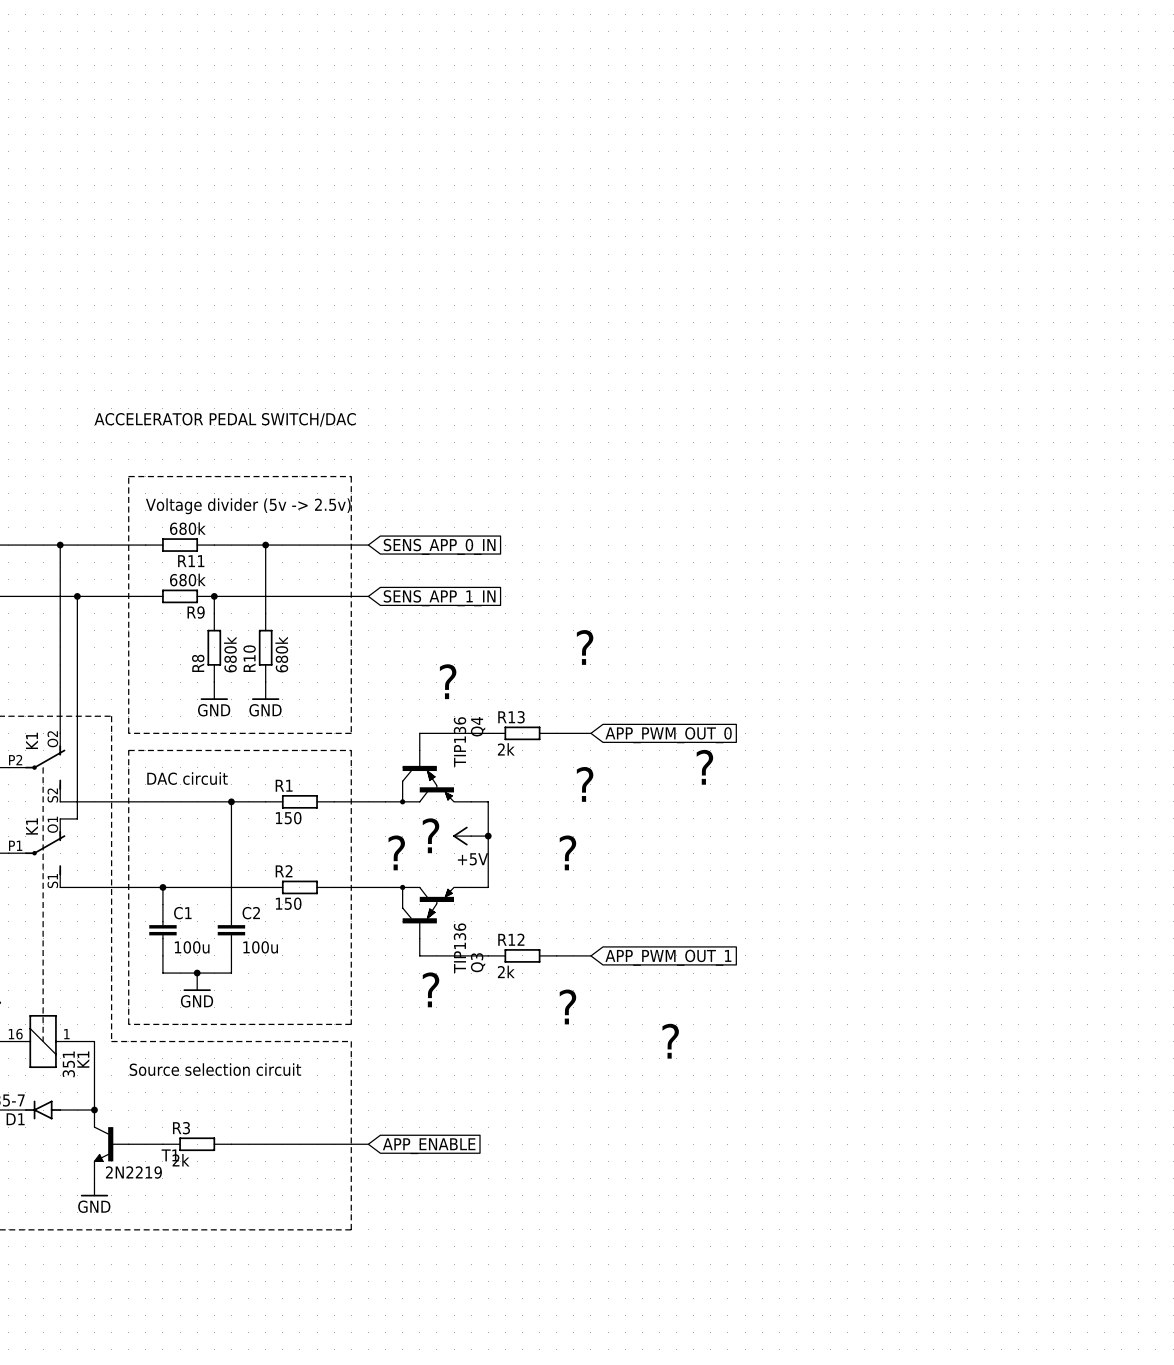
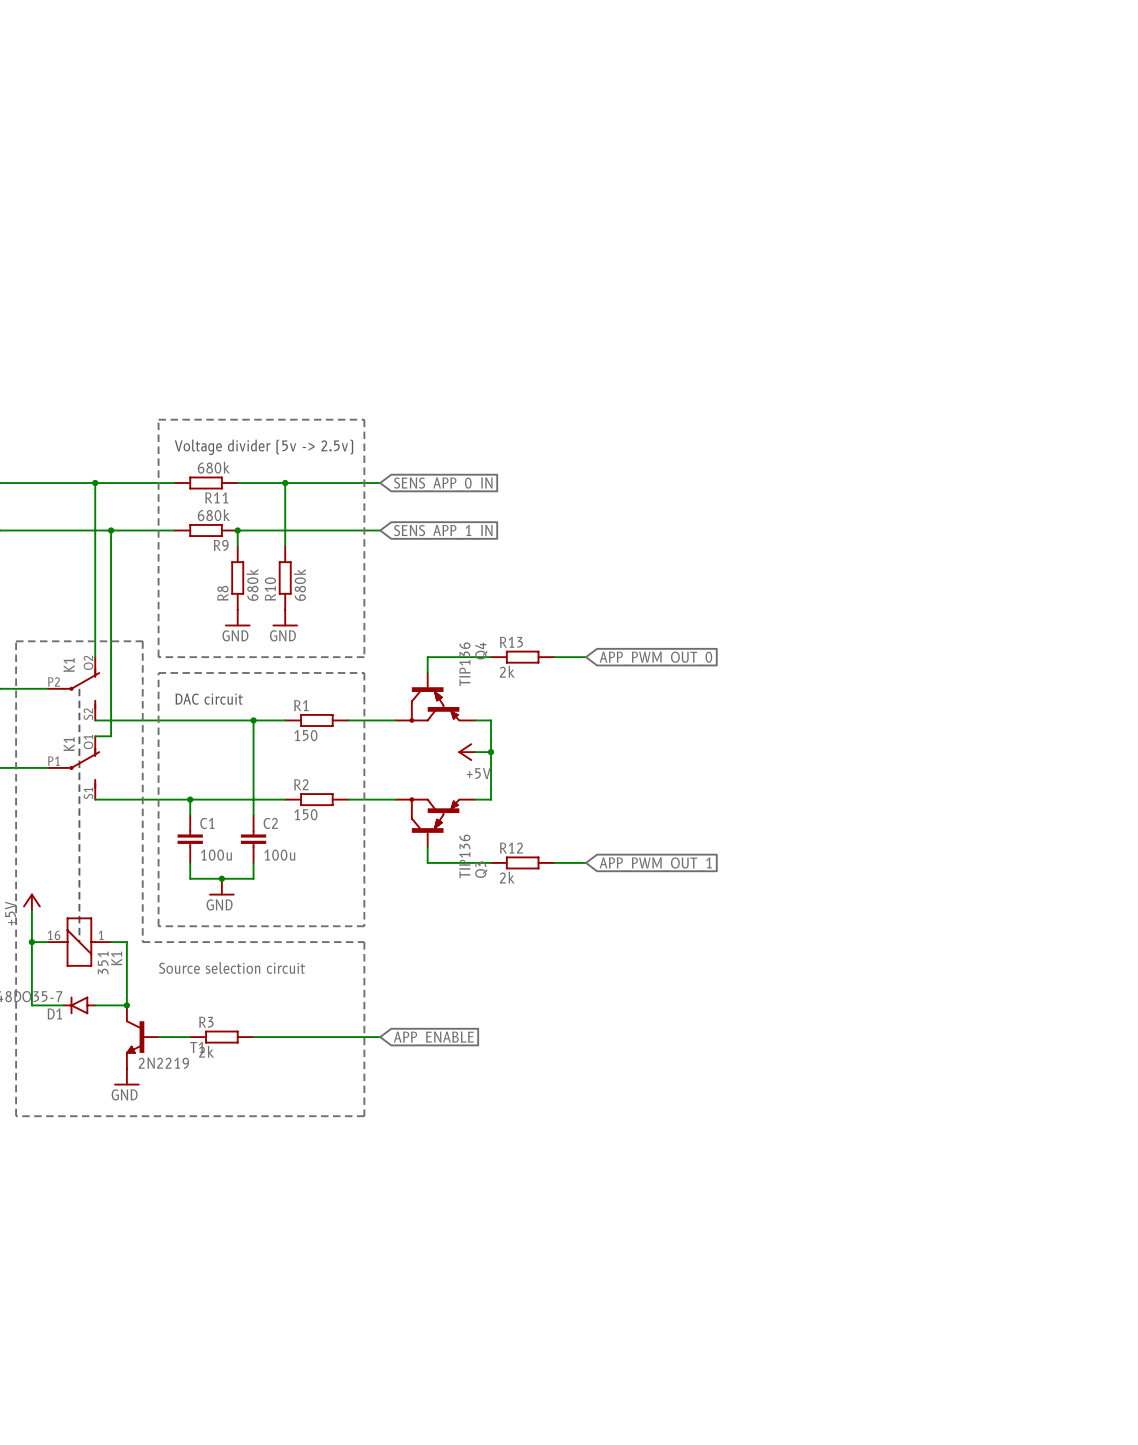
text: ACCELERATOR PEDAL SWITCH/DAC (225, 419) -> none
text: ? (585, 647) -> none
text: ? (448, 681) -> none
text: ? (704, 767) -> none
text: ? (585, 784) -> none
text: ? (431, 835) -> none
text: ? (396, 852) -> none
text: ? (567, 852) -> none
text: ? (431, 989) -> none
text: ? (567, 1006) -> none
text: ? (670, 1041) -> none

